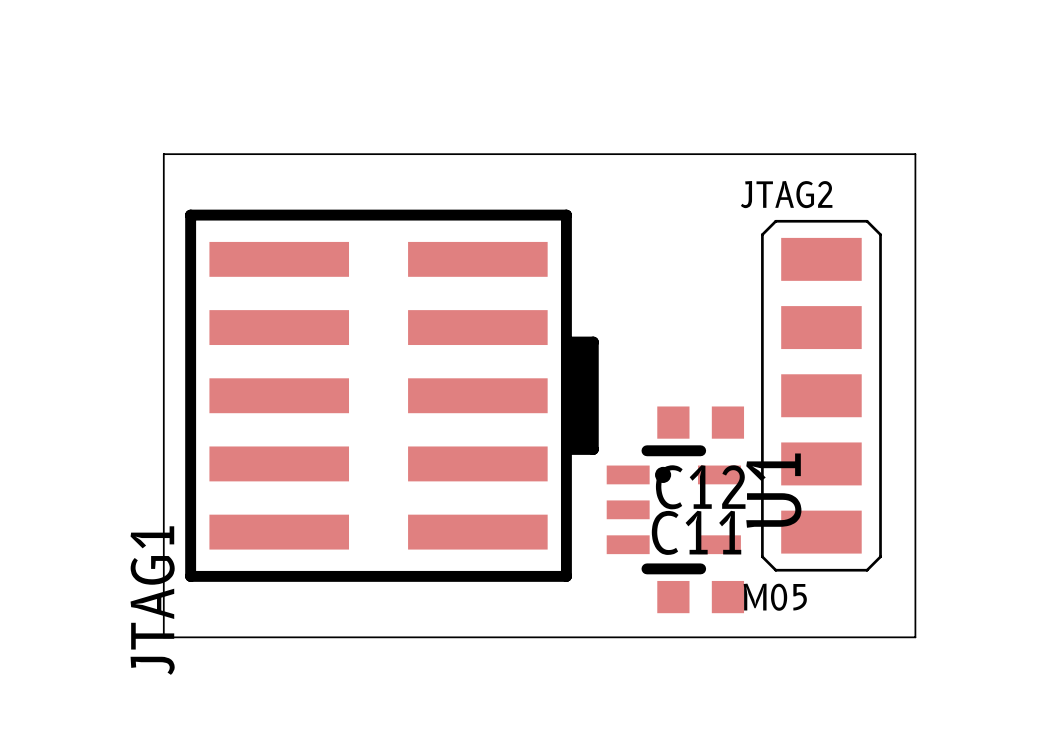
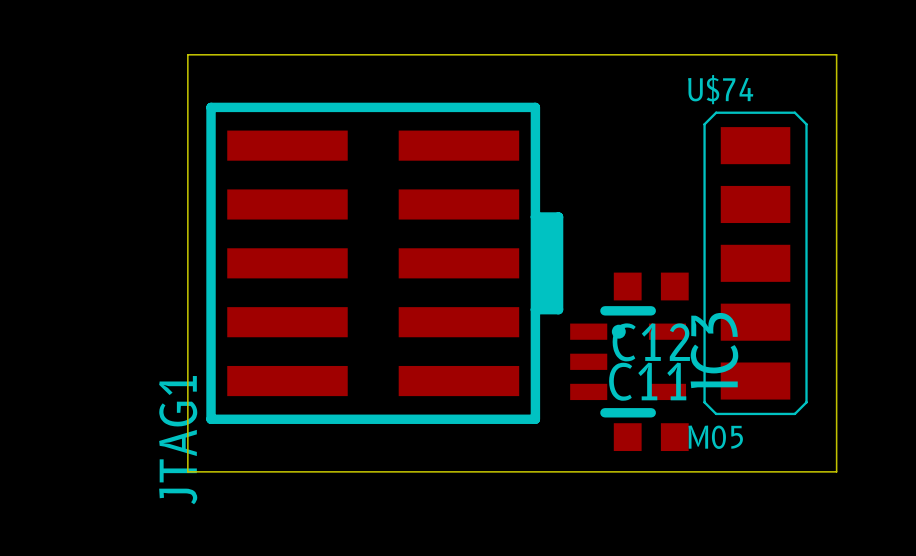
JTAG2 name: JTAG2 (786, 194) -> U$74 (720, 89)
U1 name: U1 (773, 490) -> IC3 (714, 350)

